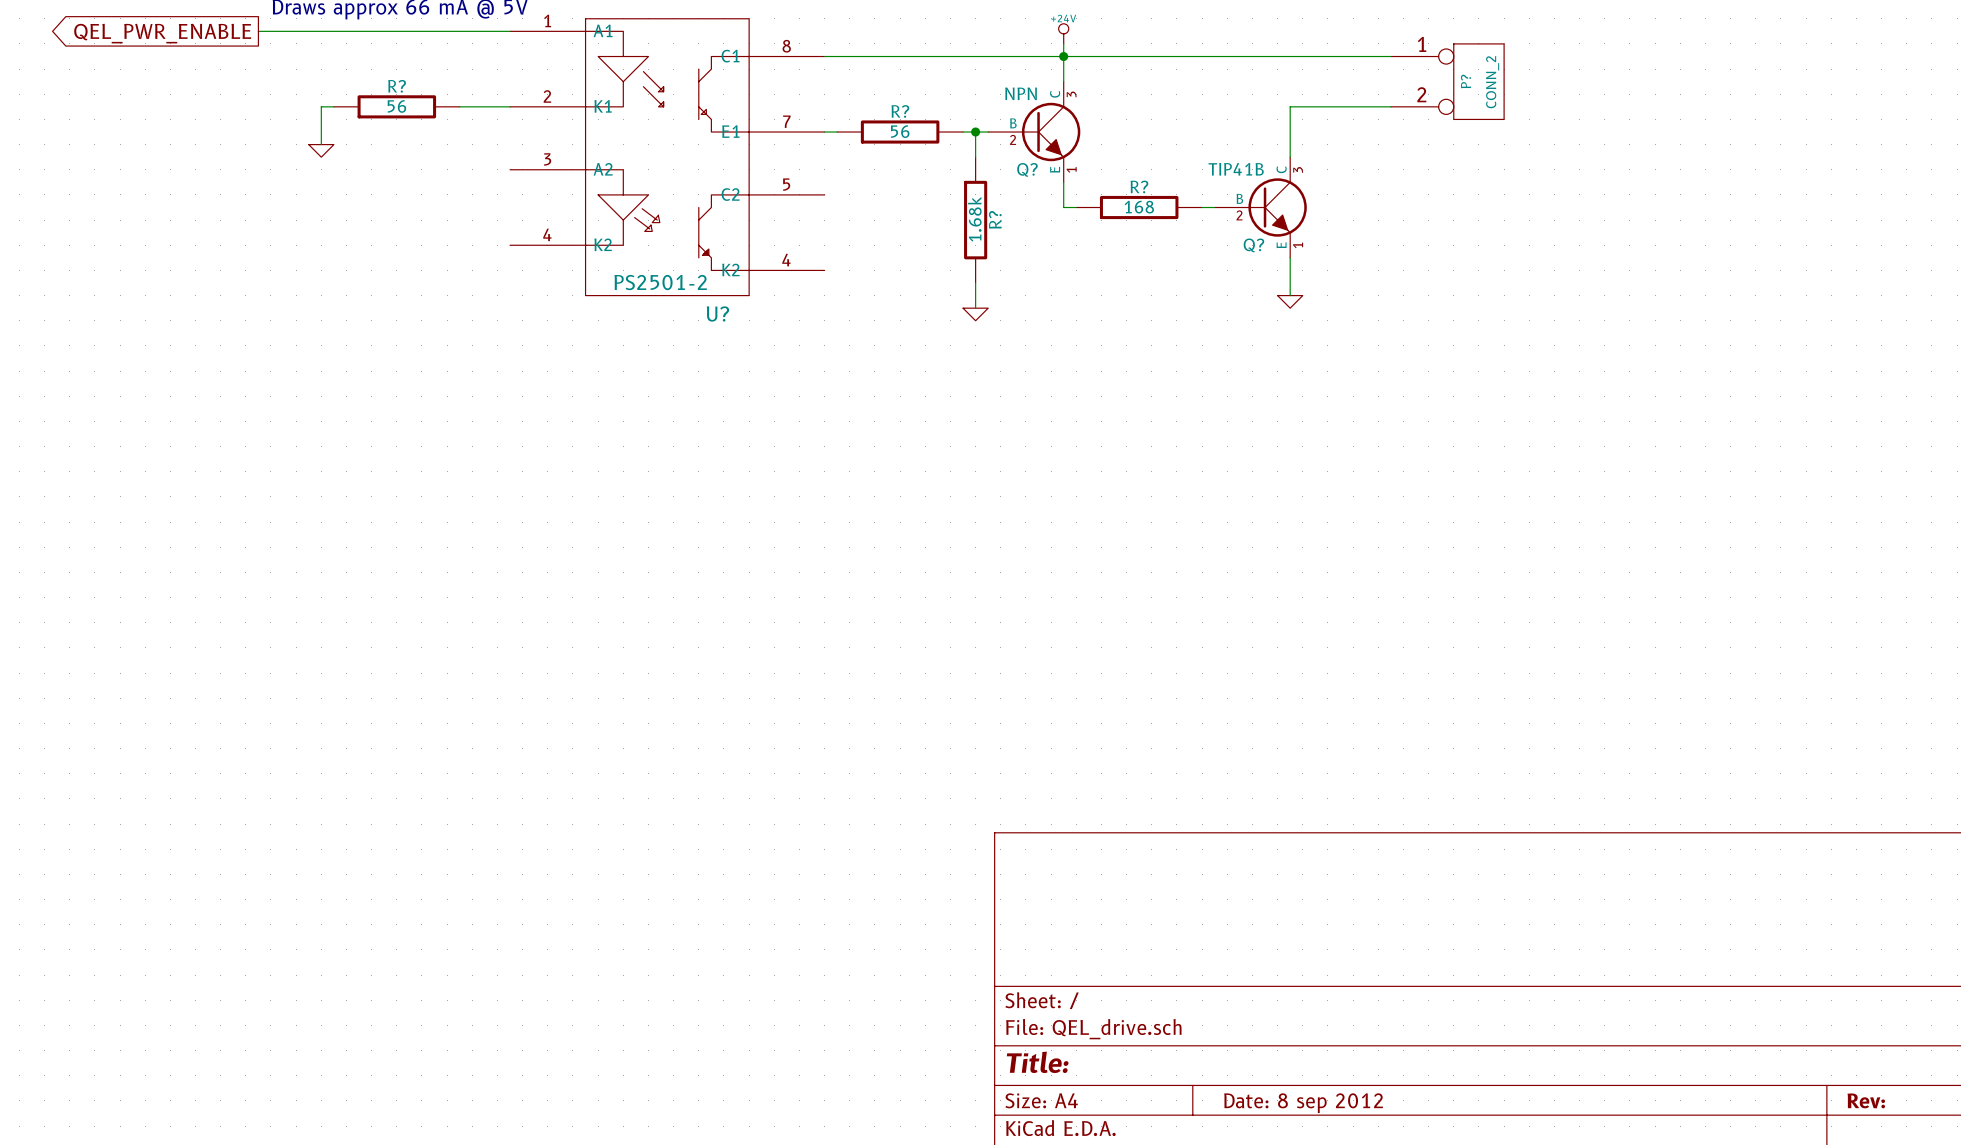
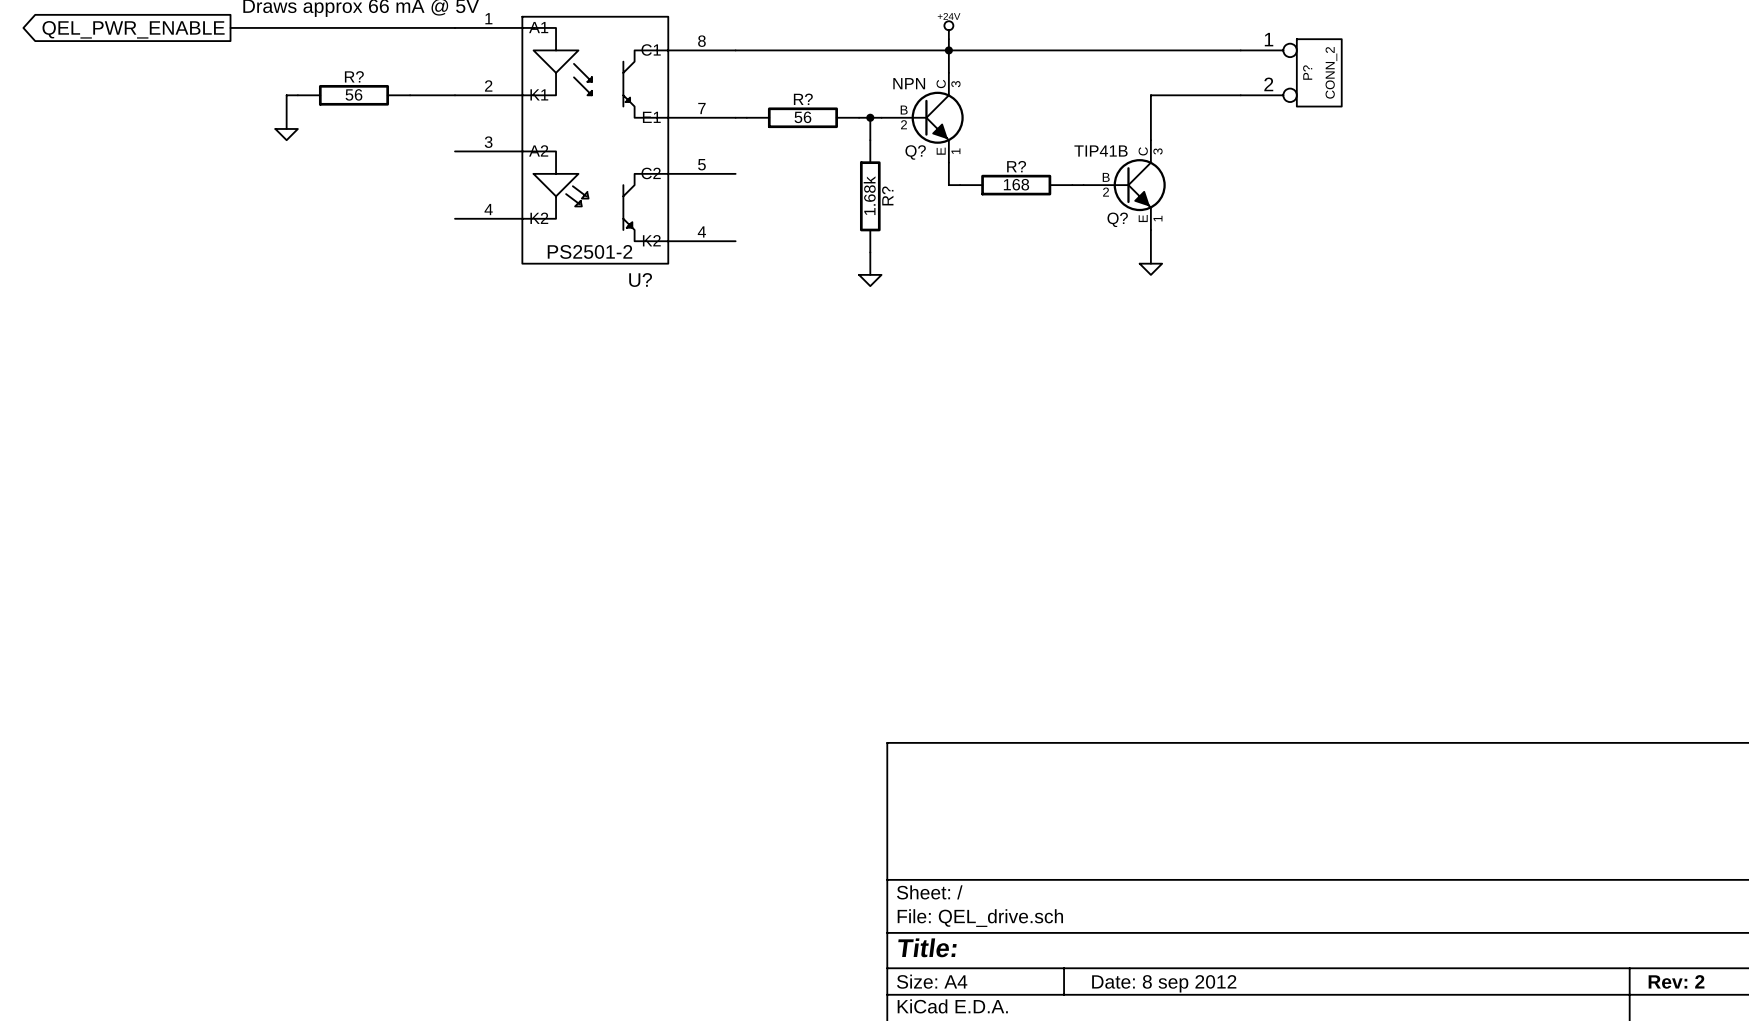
title block: Rev: (1866, 1100) -> Rev: 2 (1676, 981)

